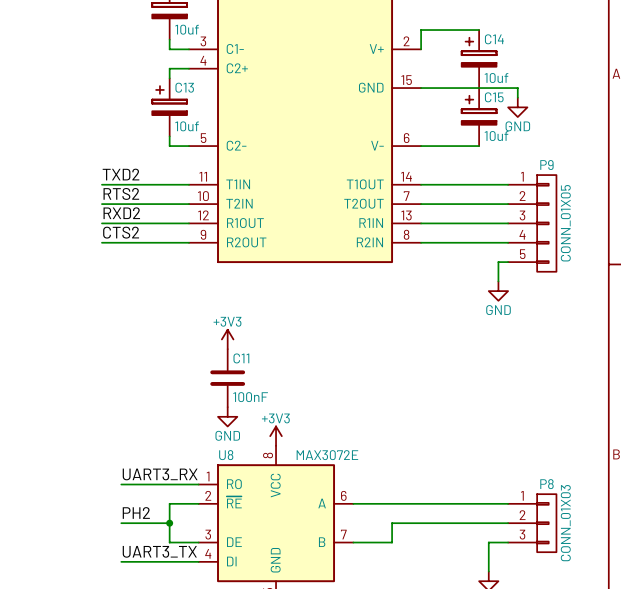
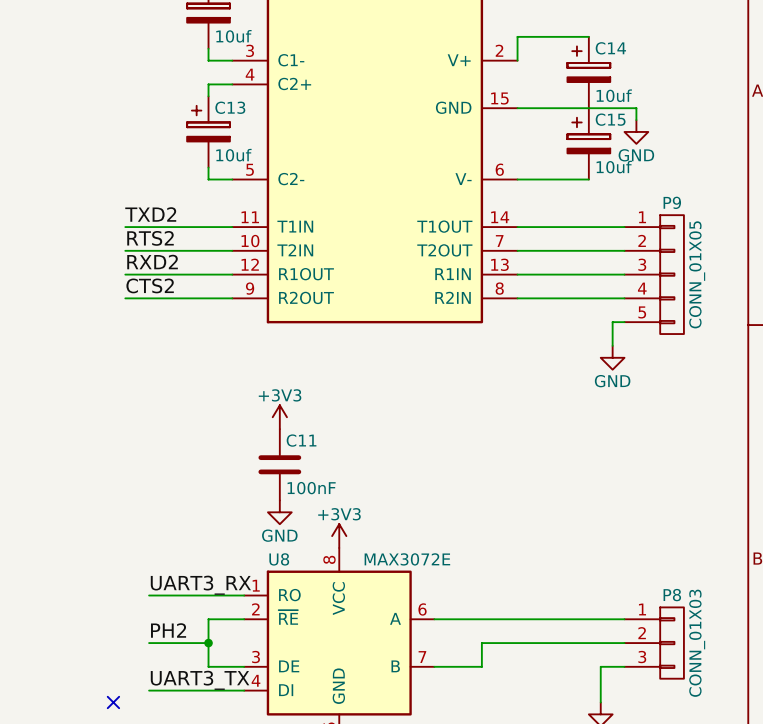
no-connect mark: none -> (113, 702)

